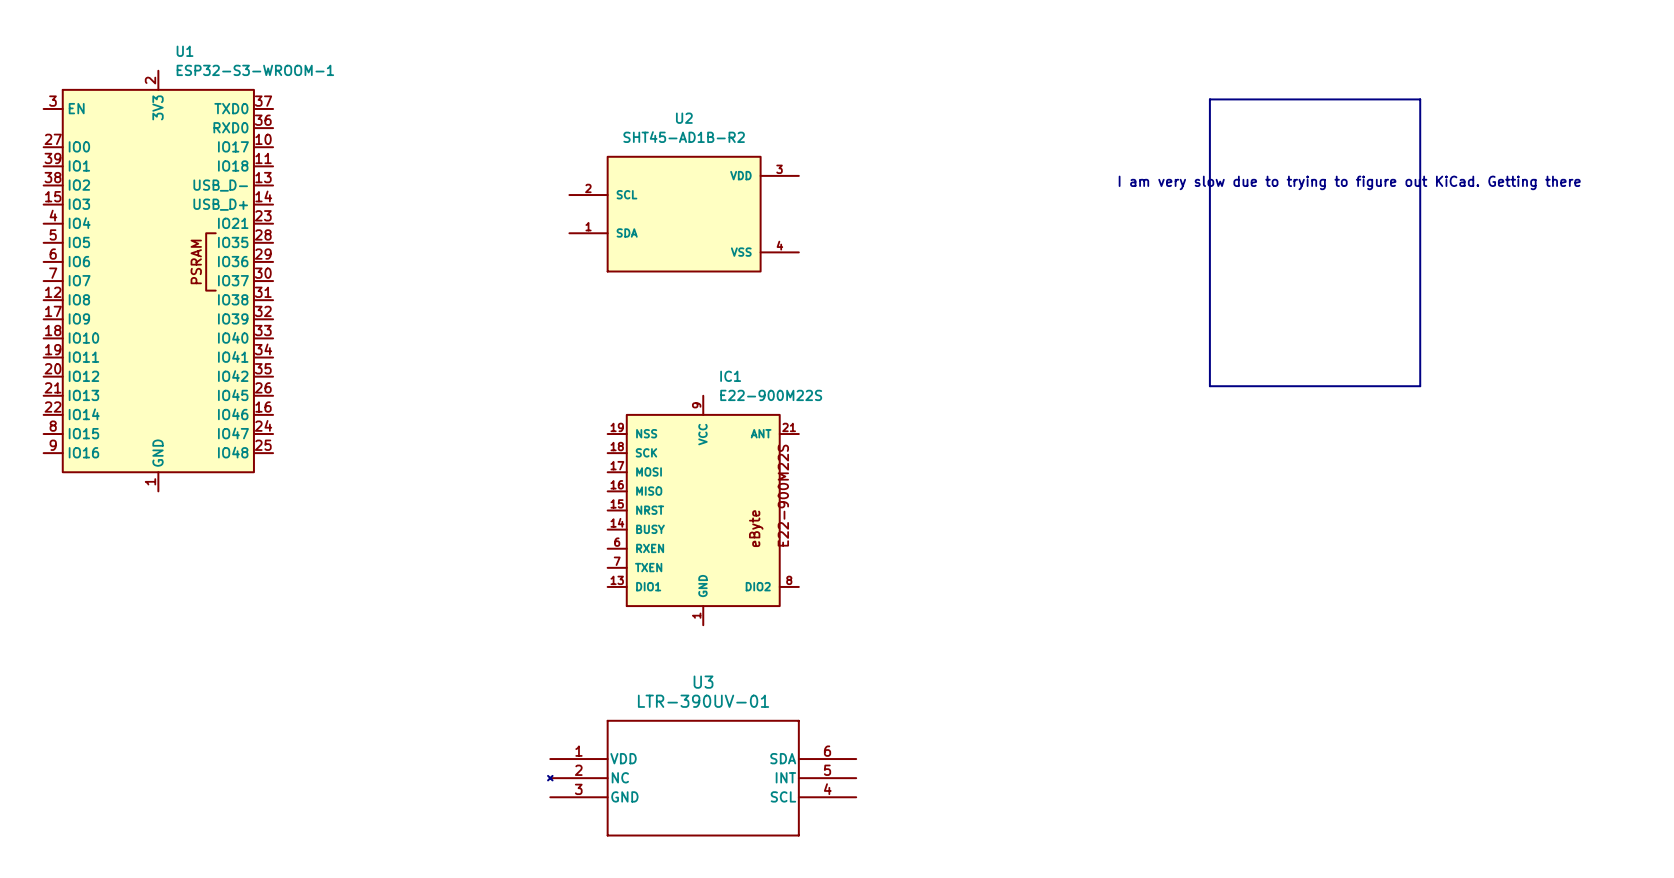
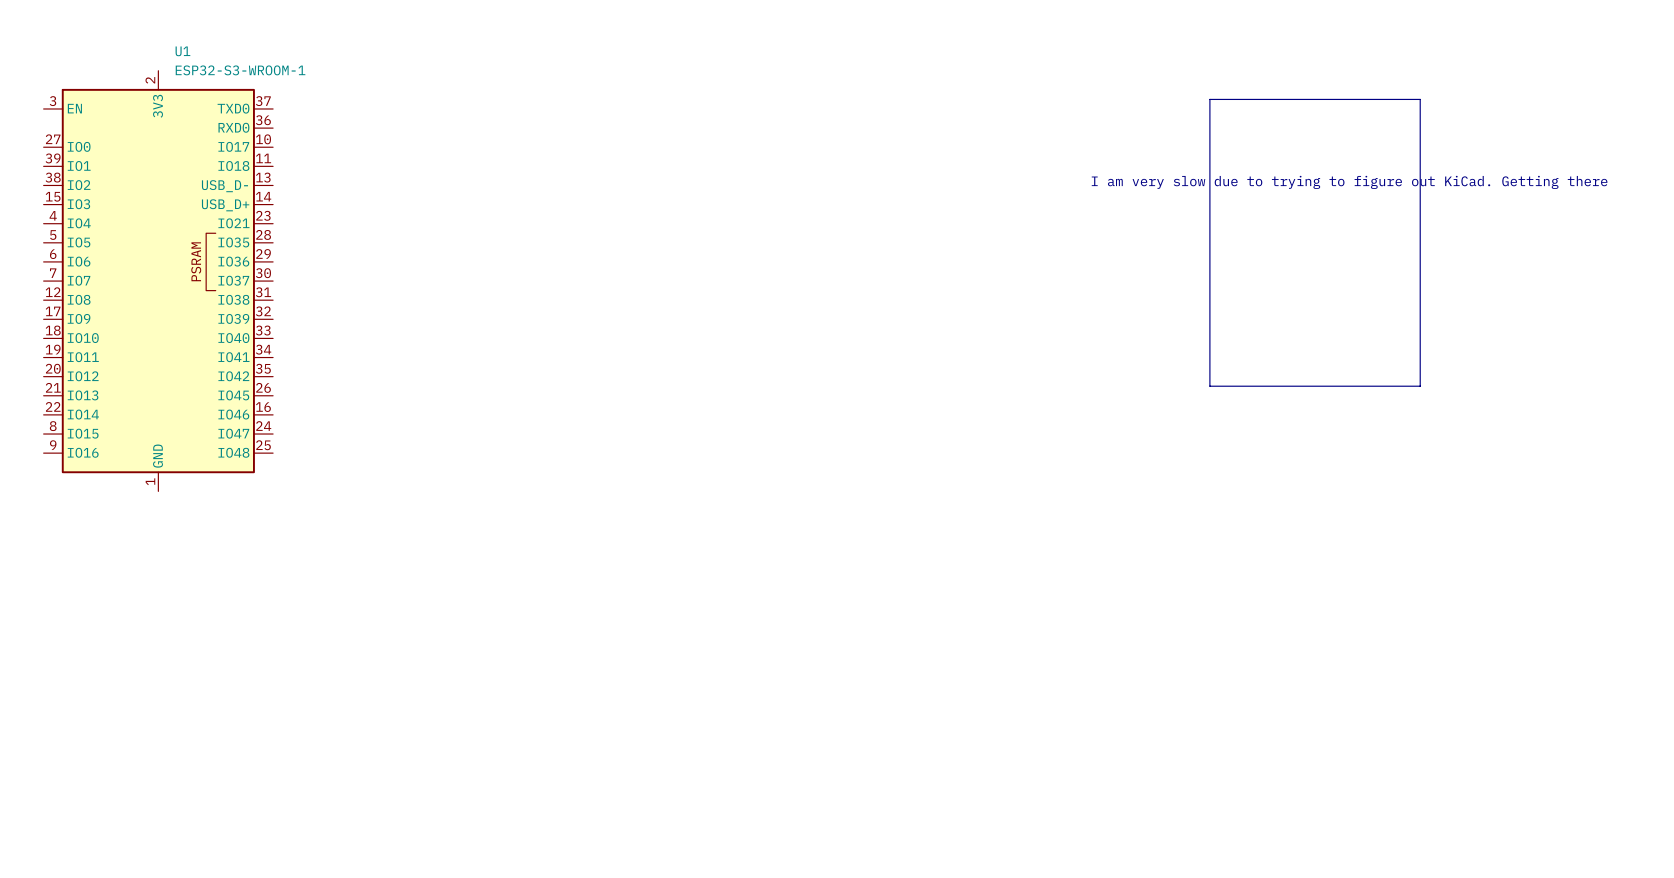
U2: SHT45-AD1B-R2 (684, 214) -> none
IC1: E22-900M22S (703, 510) -> none
U3: LTR-390UV-01 (702, 778) -> none

